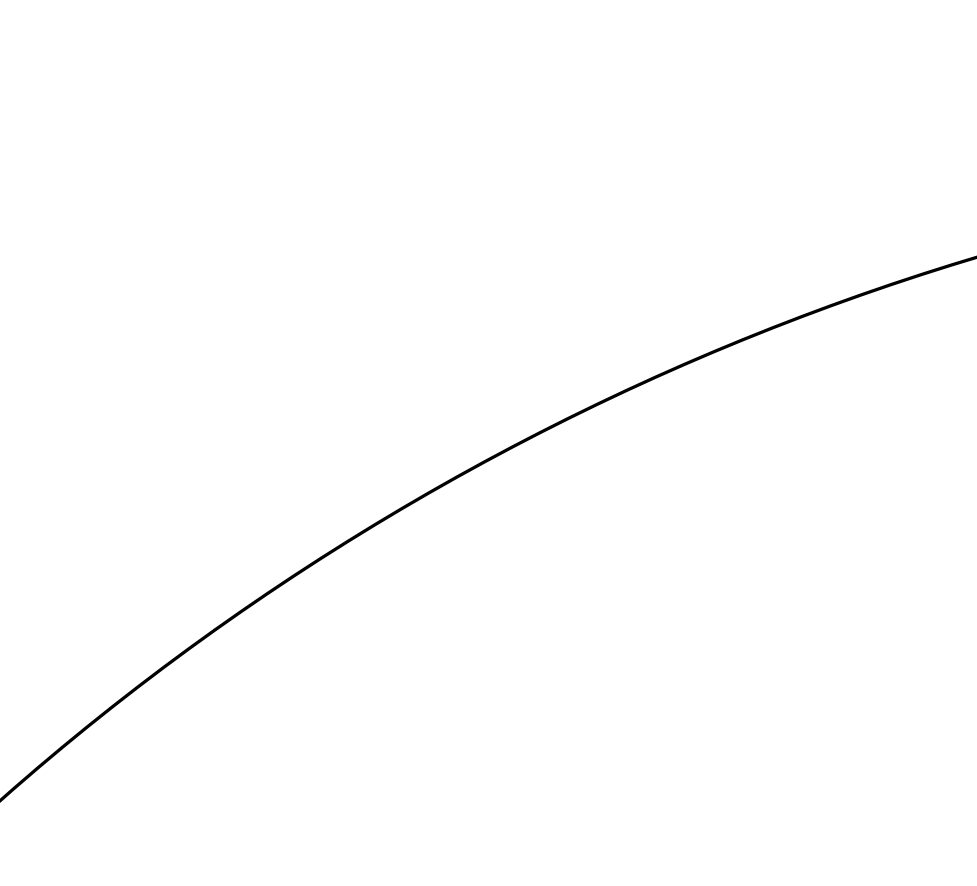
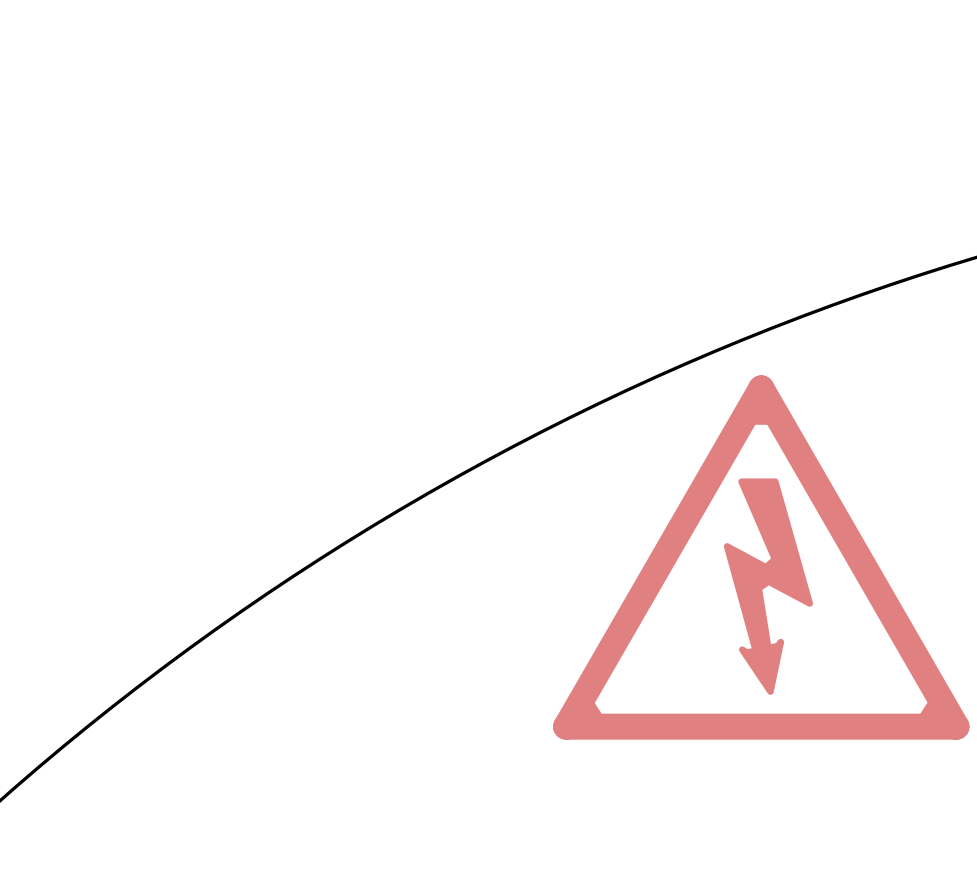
drawing: none -> [553, 375, 970, 740]

